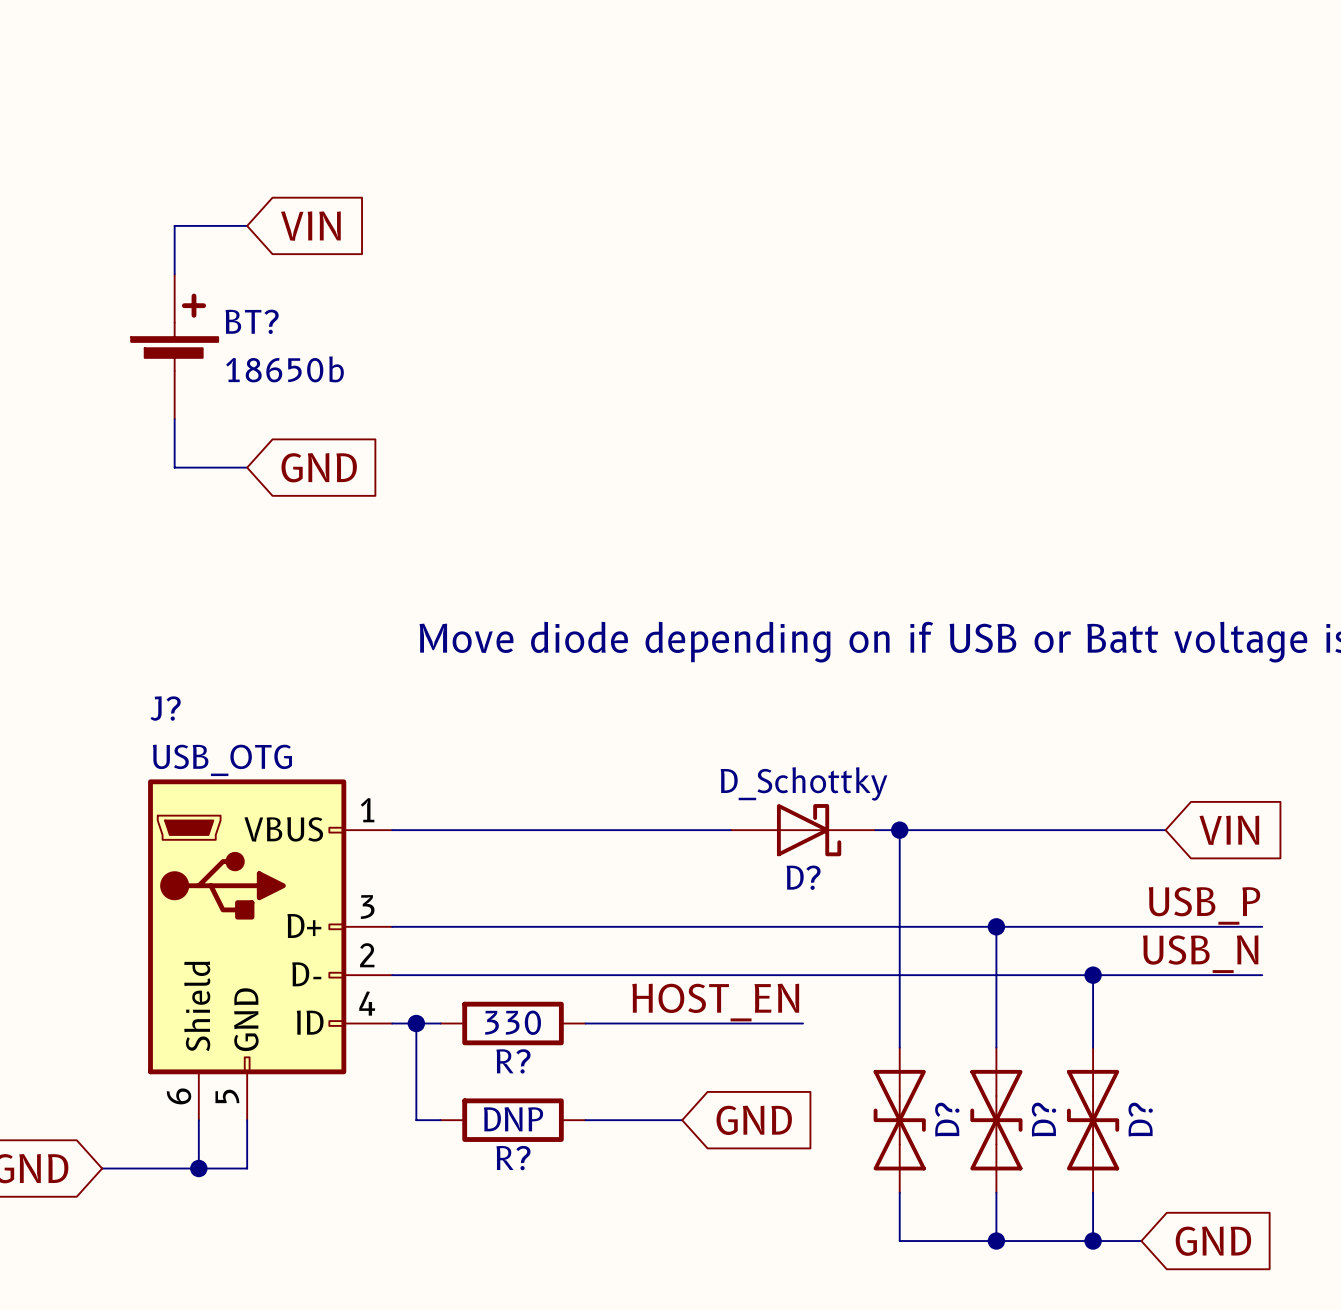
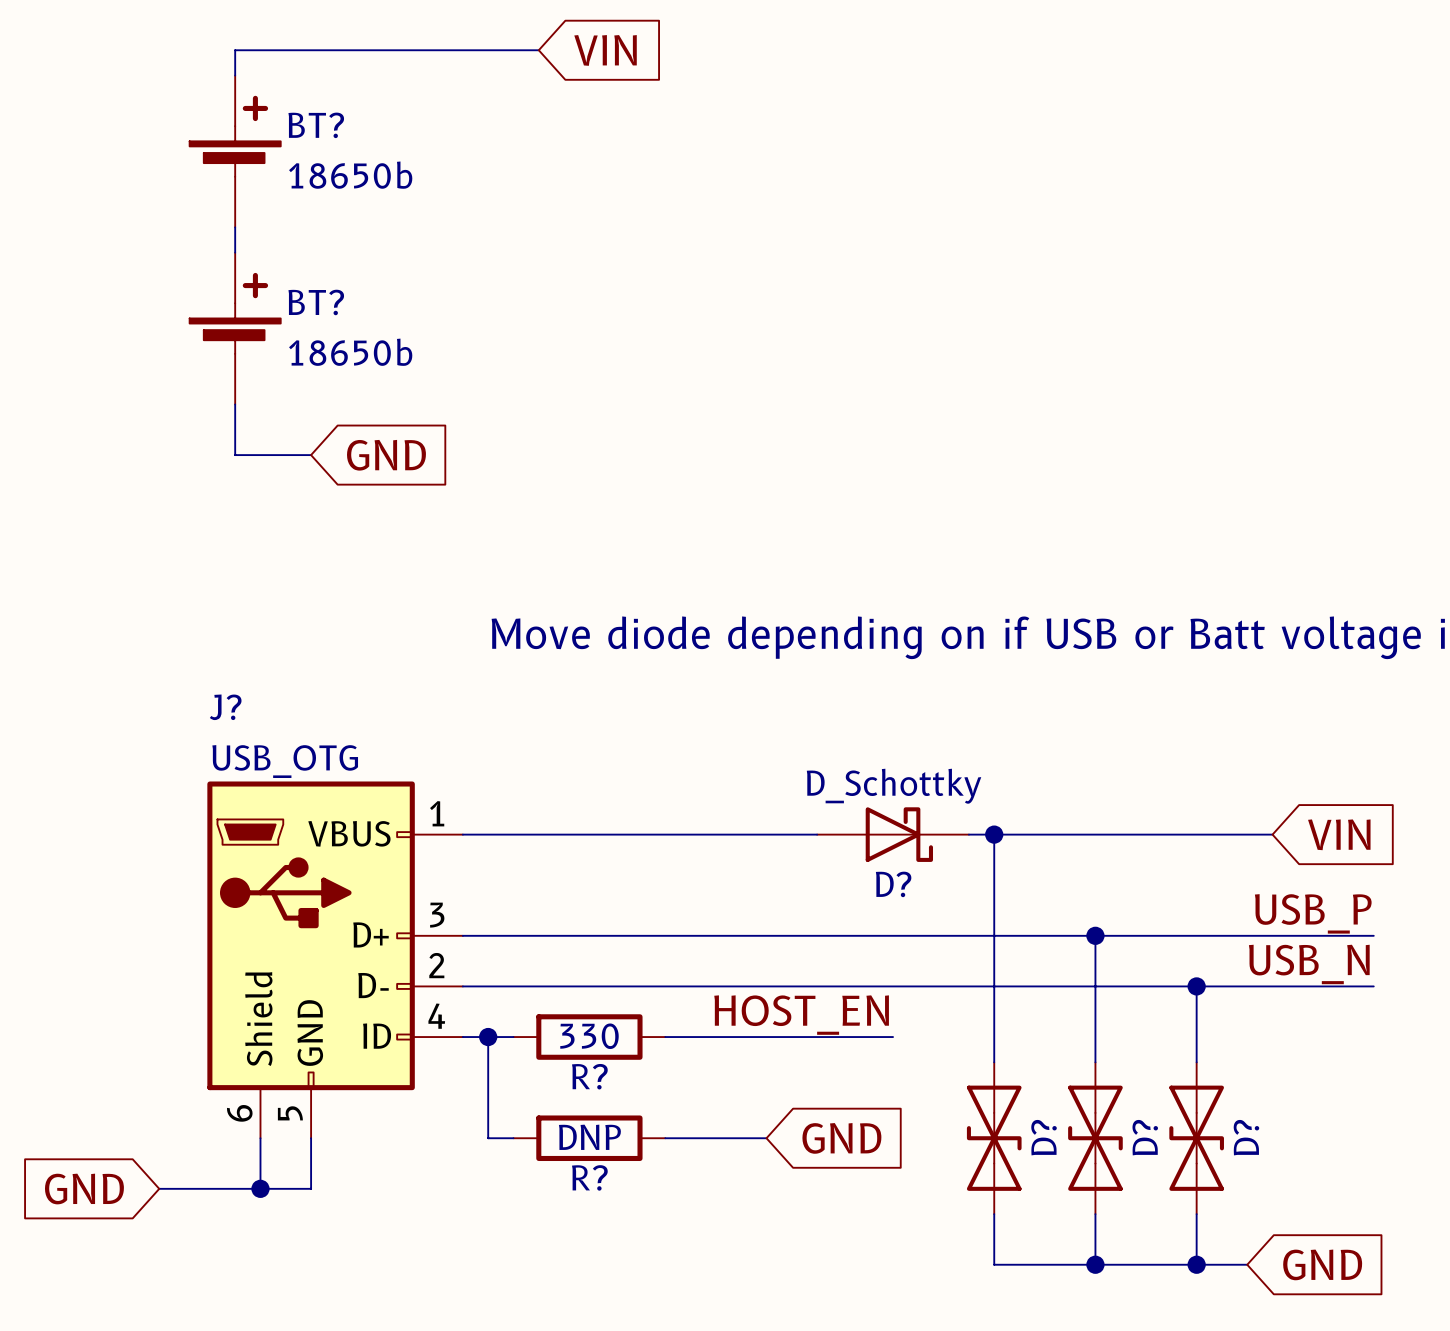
wire: none -> (538, 50) (235, 50) (235, 75)
BT?: none -> 18650b (235, 151)
wire: (247, 225) (174, 225) (174, 250) -> none
global label position: VIN (310, 226) -> VIN (605, 50)

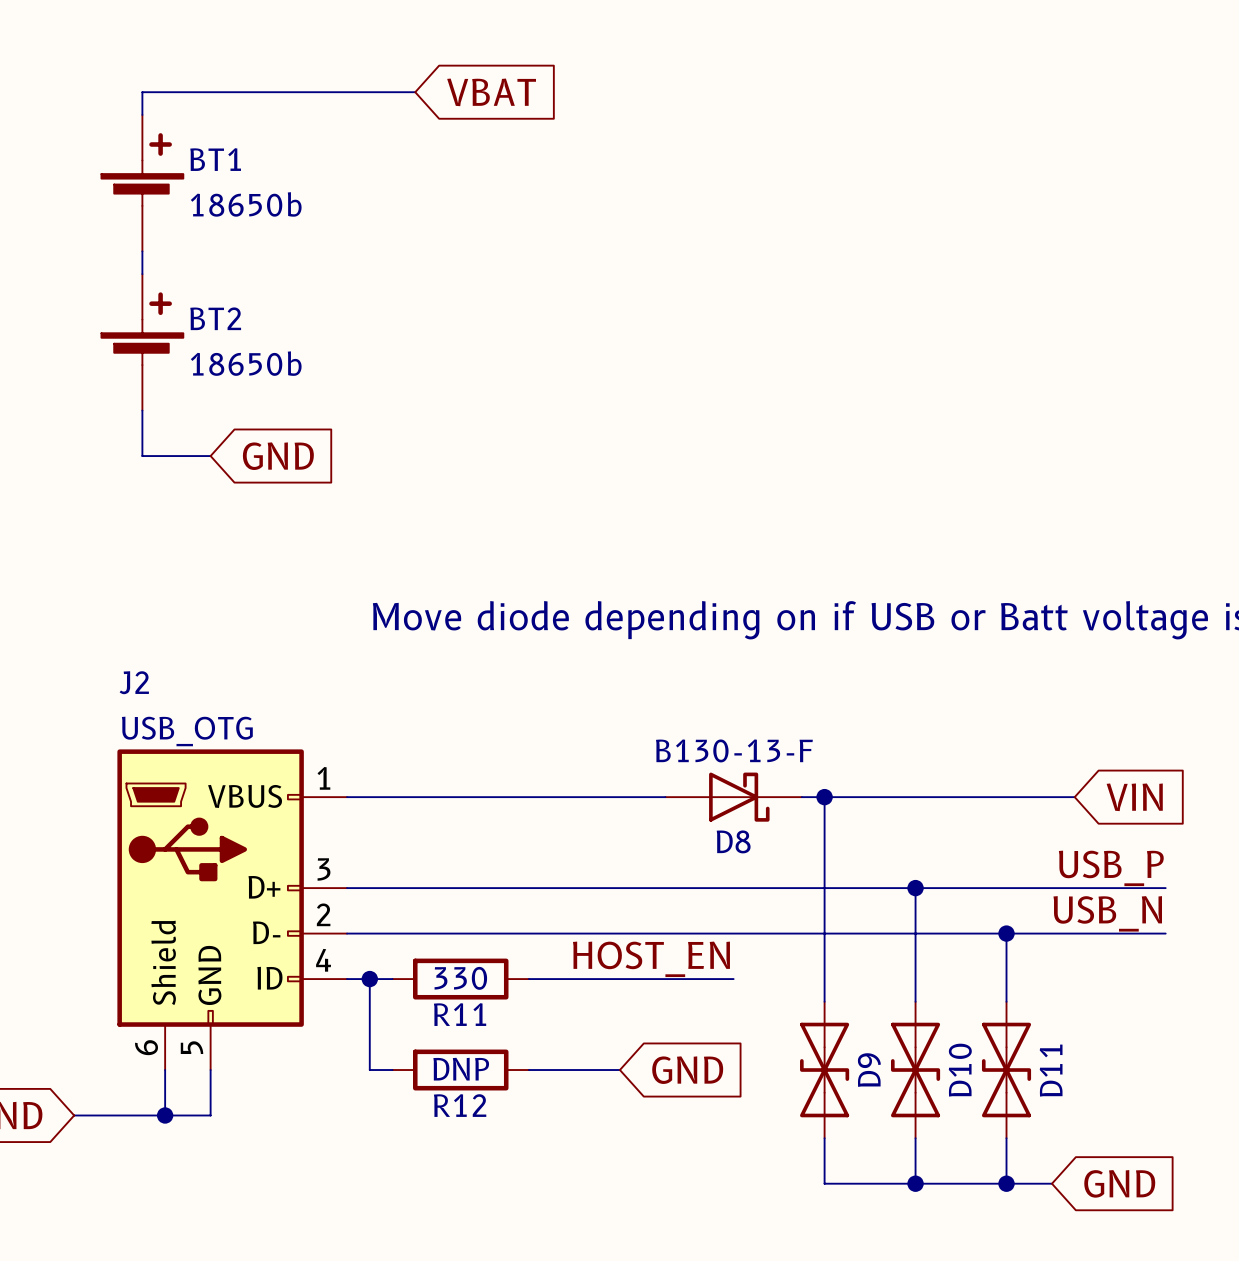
global label: VIN (605, 50) -> VBAT (491, 92)
BT? name: BT? (316, 125) -> BT1 (215, 159)
BT? name: BT? (316, 302) -> BT2 (215, 318)
J? name: J? (225, 707) -> J2 (134, 682)
D? value: D_Schottky (894, 786) -> B130-13-F (734, 750)
D? name: D? (893, 884) -> D8 (733, 841)
R? name: R? (589, 1076) -> R11 (460, 1014)
D? name: D? (1044, 1137) -> D9 (869, 1070)
D? name: D? (1145, 1137) -> D10 (960, 1070)
D? name: D? (1246, 1137) -> D11 (1051, 1070)
R? name: R? (589, 1177) -> R12 (460, 1105)

